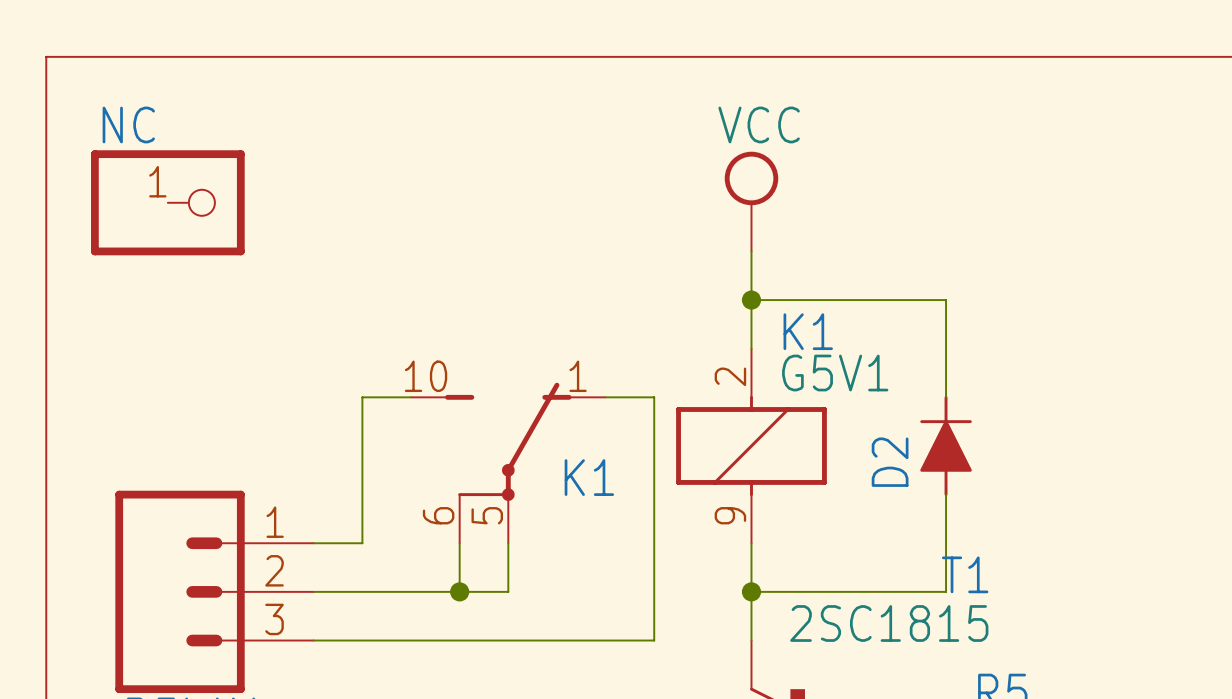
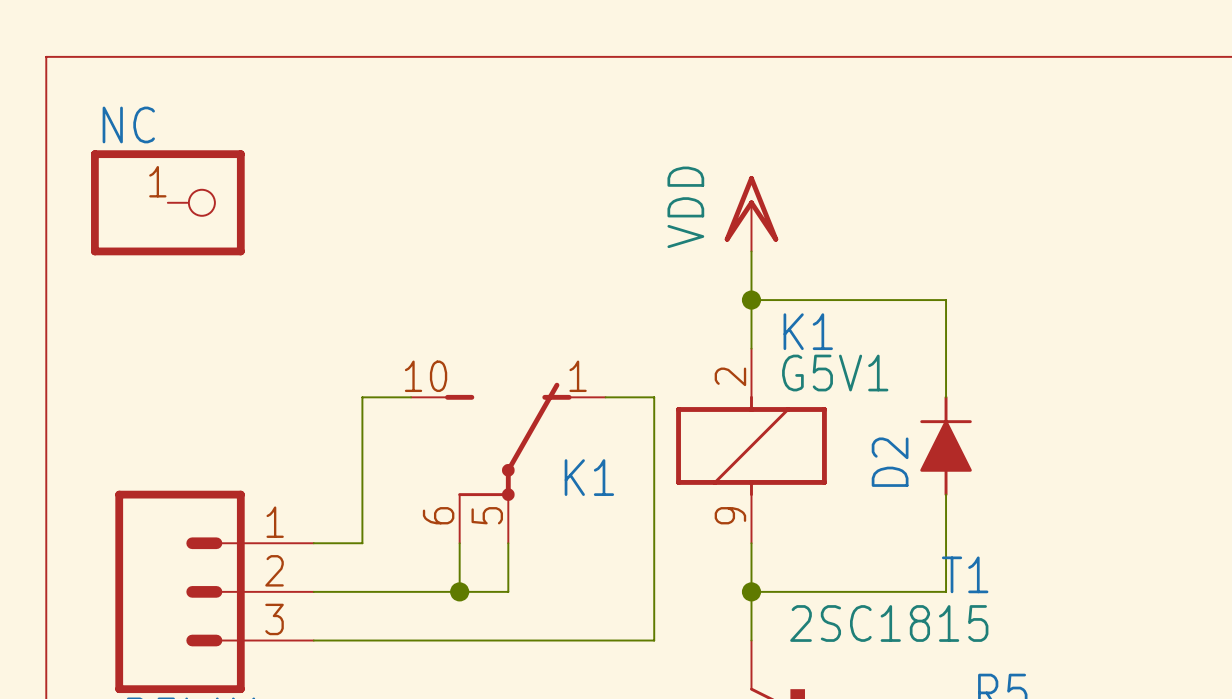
power symbol: VCC (751, 201) -> VDD (751, 213)

